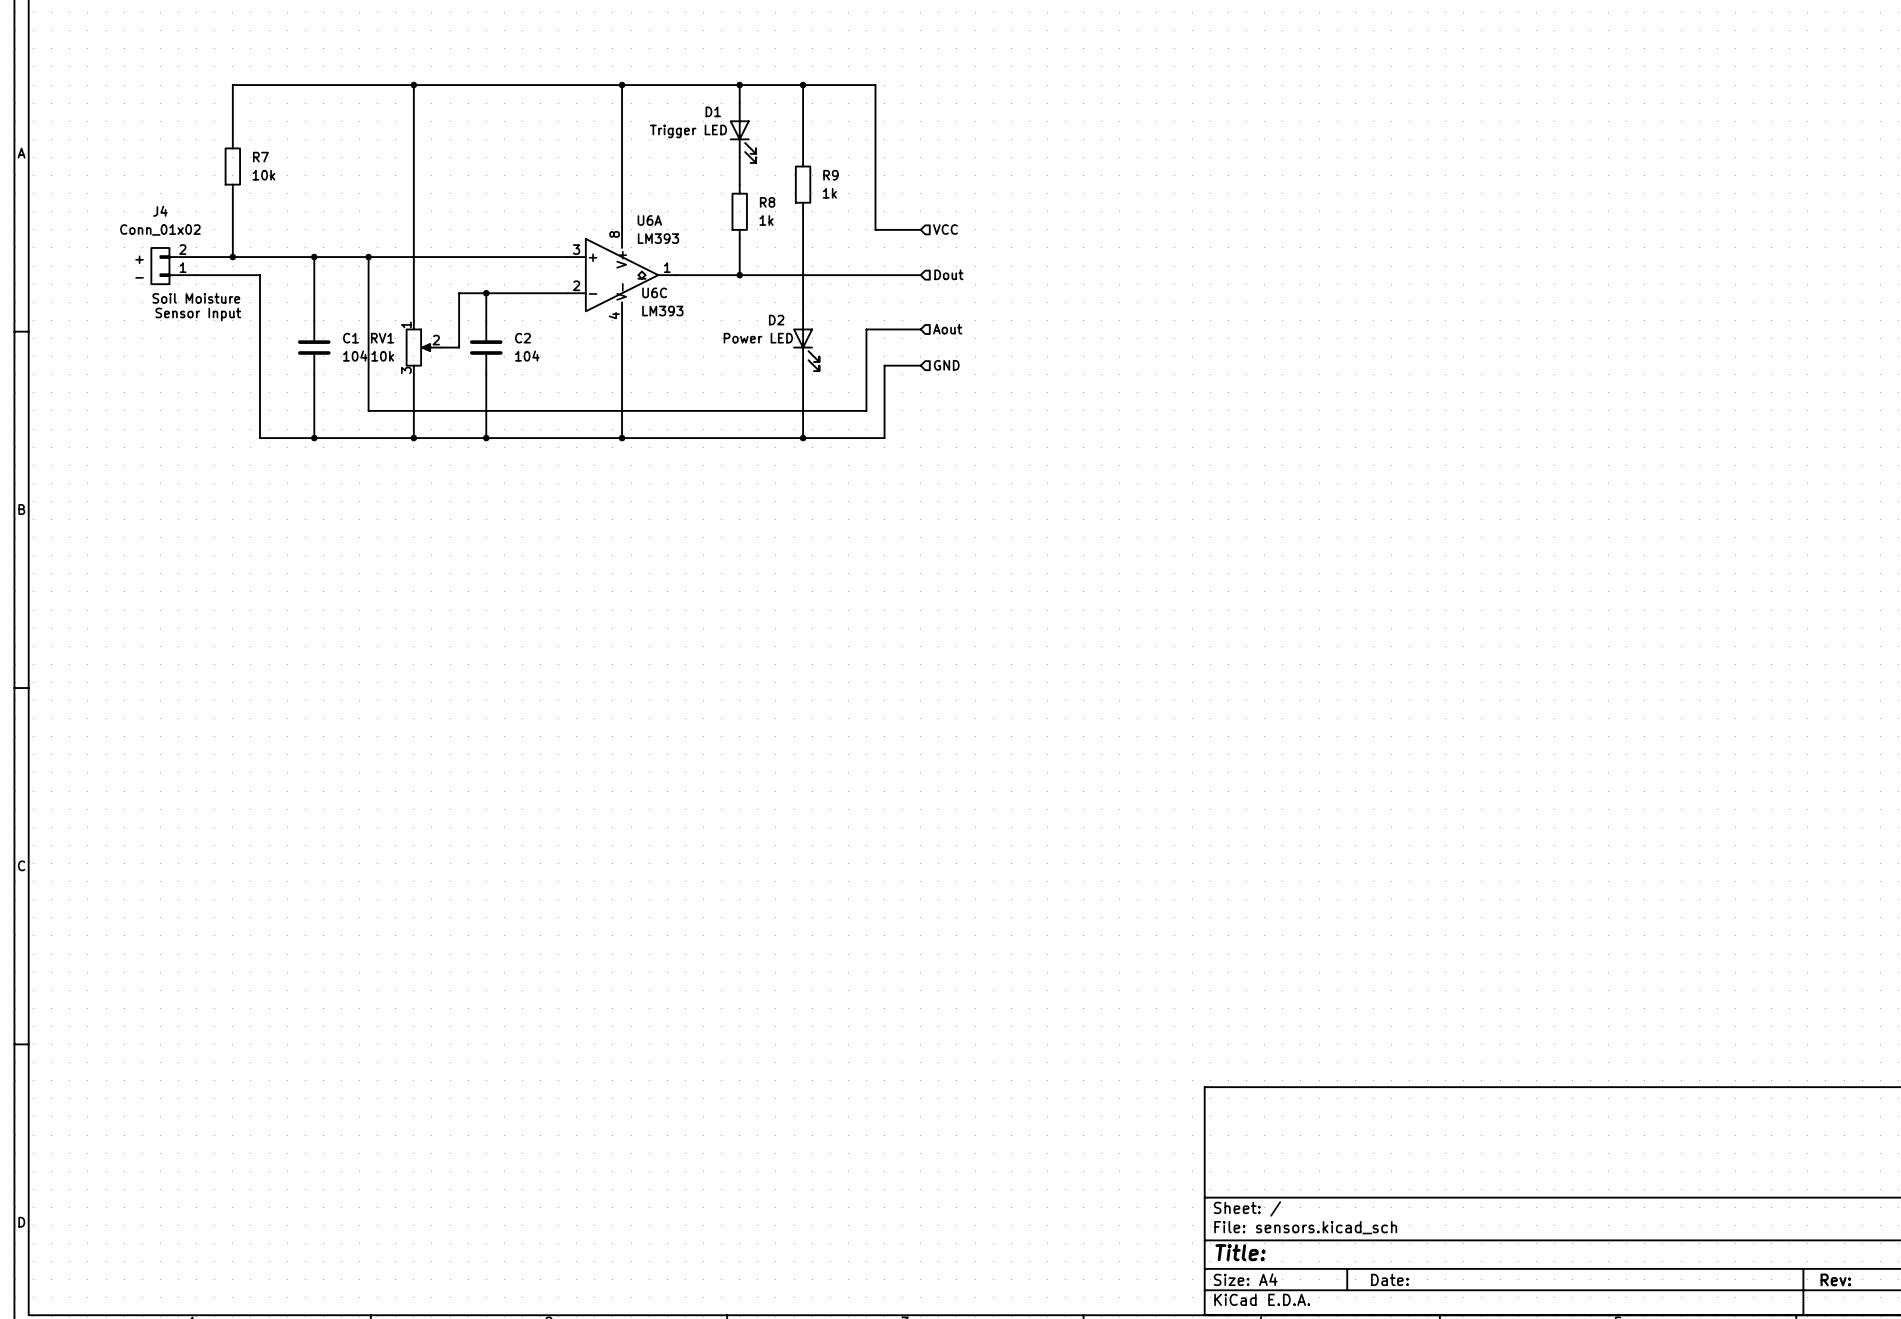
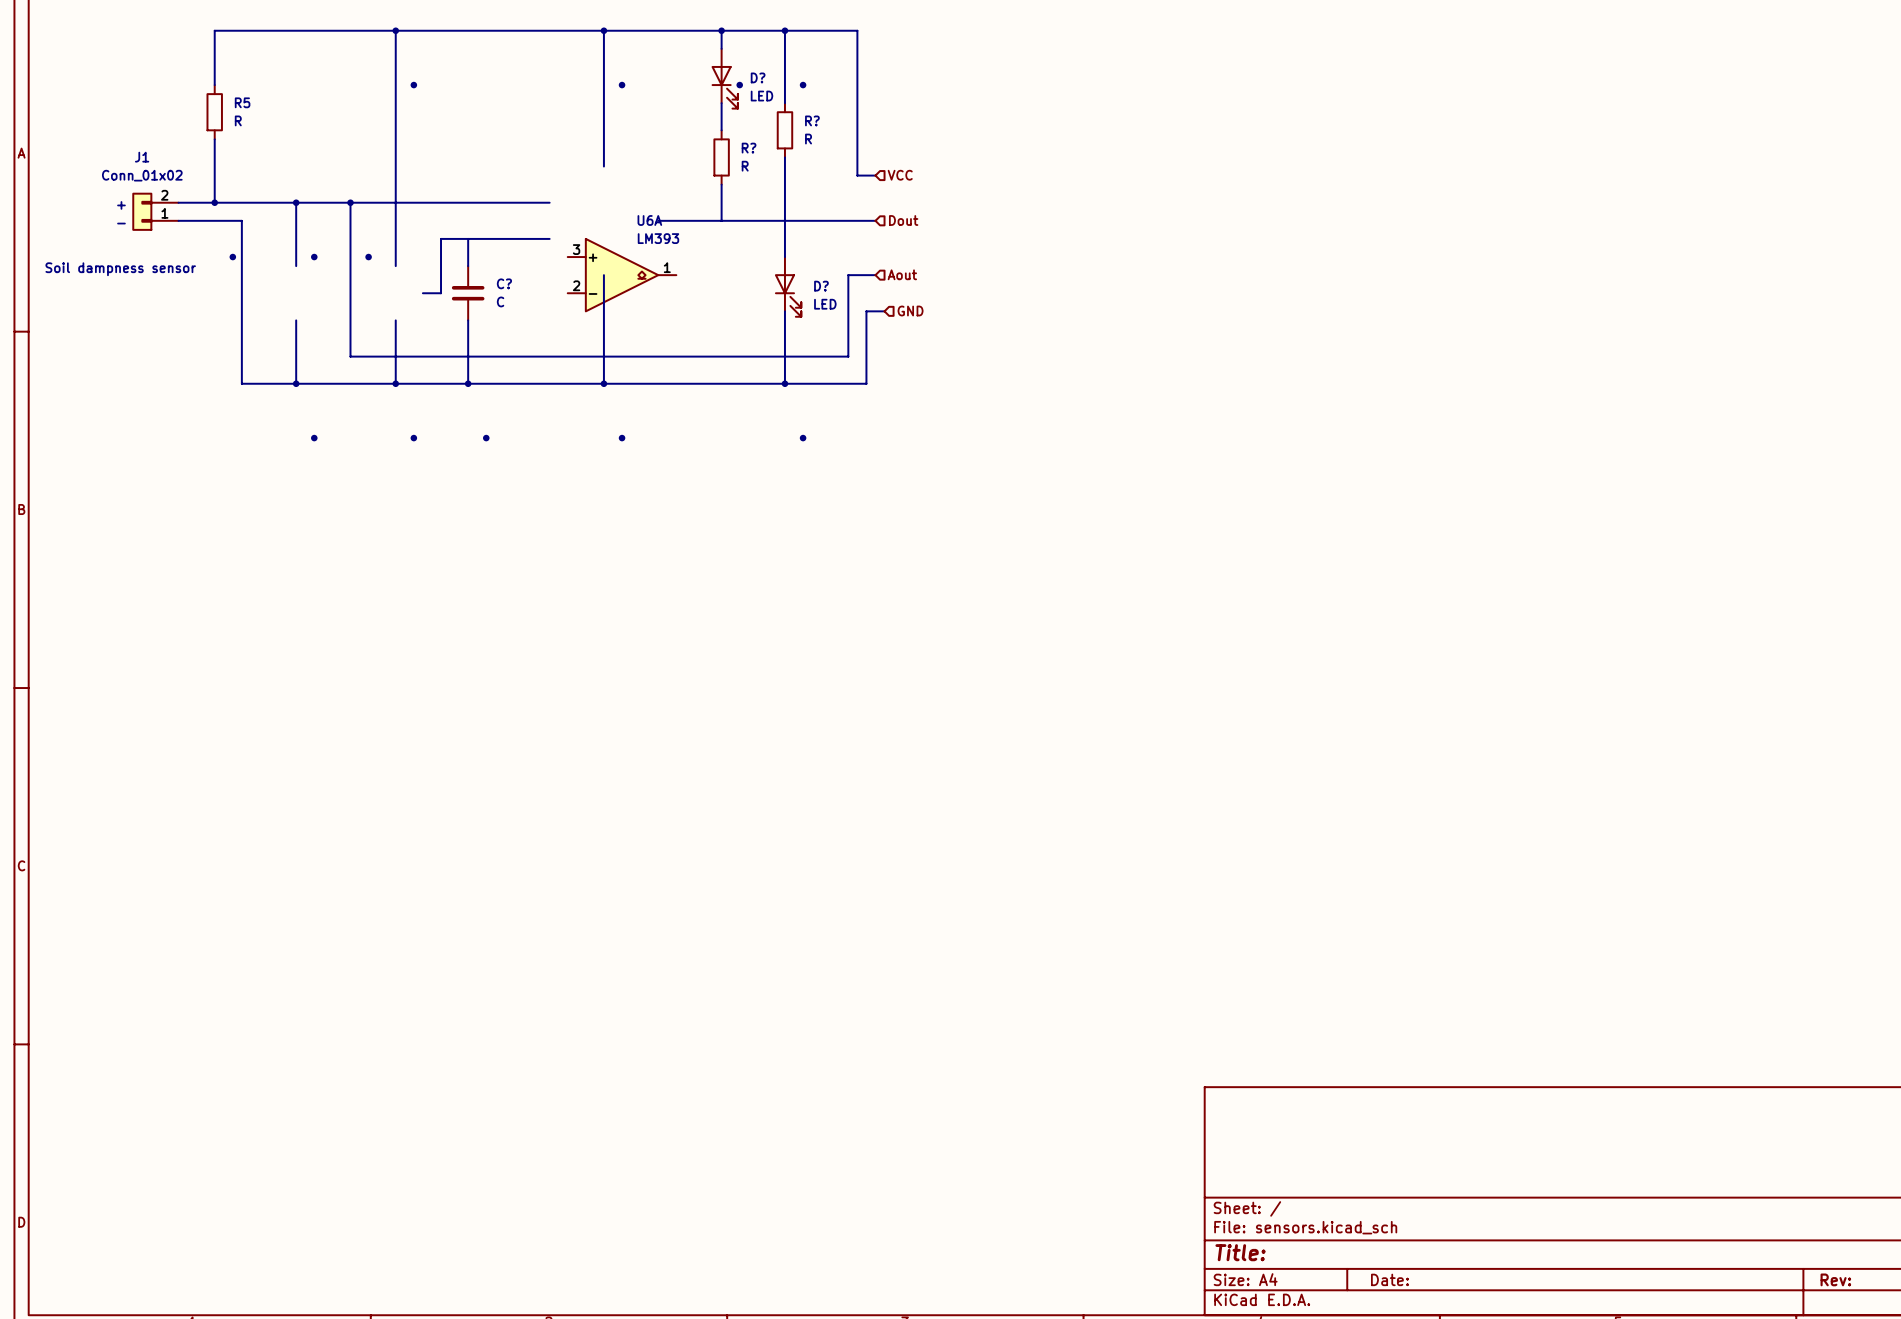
junction: none -> (395, 30)
junction: none -> (603, 30)
junction: none -> (721, 30)
junction: none -> (784, 30)
D?: none -> LED (724, 78)
wire: none -> (214, 85) (214, 30) (857, 30) (857, 175) (875, 175)
wire: (413, 85) (413, 320) -> (395, 30) (395, 266)
wire: (622, 85) (622, 220) -> (603, 30) (603, 166)
wire: (739, 85) (739, 103) -> (721, 30) (721, 48)
wire: (803, 85) (803, 157) -> (784, 30) (784, 103)
R5: none -> R (214, 112)
R?: none -> R (784, 130)
D1: Trigger LED (742, 133) -> none
wire: (232, 139) (232, 85) (875, 85) (875, 229) (920, 229) -> none
R?: none -> R (721, 157)
wire: (739, 157) (739, 184) -> (721, 103) (721, 130)
R7: 10k (232, 166) -> none
R9: 1k (803, 184) -> none
wire: (232, 193) (232, 257) -> (214, 139) (214, 202)
junction: none -> (214, 202)
junction: none -> (296, 202)
junction: none -> (350, 202)
J1: none -> Conn_01x02 (155, 211)
R8: 1k (739, 211) -> none
wire: (803, 211) (803, 311) -> (784, 157) (784, 257)
wire: none -> (658, 220) (875, 220)
hierarchical label position: VCC (945, 229) -> VCC (900, 175)
wire: (739, 238) (739, 275) -> (721, 184) (721, 220)
wire: (196, 257) (567, 257) -> (178, 202) (549, 202)
wire: (314, 257) (314, 320) -> (296, 202) (296, 266)
wire: (368, 257) (368, 410) (866, 410) (866, 383) -> (178, 220) (241, 220) (241, 383) (866, 383)
text position: + (139, 259) -> + (121, 205)
J4: Conn_01x02 (173, 266) -> none
text: none -> Soil dampness sensor (120, 269)
hierarchical label position: Dout (948, 274) -> Dout (903, 220)
wire: (196, 275) (259, 275) (259, 438) (884, 438) (884, 365) (920, 365) -> none
U6C: LM393 (622, 275) -> none
wire: (676, 275) (848, 275) -> (350, 202) (350, 356) (848, 356) (848, 275)
junction: (739, 275) -> none
wire: (875, 275) (920, 275) -> none
text position: - (139, 277) -> - (121, 223)
D?: none -> LED (788, 286)
C?: none -> C (468, 293)
wire: (486, 293) (486, 320) -> (468, 238) (468, 266)
junction: (486, 293) -> none
wire: (567, 293) (459, 293) (459, 347) (441, 347) -> (549, 238) (441, 238) (441, 293) (422, 293)
text: Soil Moisture (196, 298) -> none
text: Sensor Input (198, 314) -> none
wire: (622, 329) (622, 438) -> (603, 275) (603, 383)
wire: (866, 329) (920, 329) -> (866, 329) (866, 311) (884, 311)
hierarchical label position: Aout (947, 329) -> Aout (902, 274)
D2: Power LED (806, 341) -> none
C1: 104 (314, 347) -> none
RV1: 10k (423, 347) -> none
C2: 104 (486, 347) -> none
wire: (803, 365) (803, 438) -> (784, 311) (784, 383)
hierarchical label position: GND (946, 365) -> GND (910, 311)
wire: (314, 374) (314, 438) -> (296, 320) (296, 383)
wire: (413, 374) (413, 438) -> (395, 320) (395, 383)
wire: (486, 374) (486, 438) -> (468, 320) (468, 383)
junction: none -> (296, 383)
junction: none -> (395, 383)
junction: none -> (468, 383)
junction: none -> (603, 383)
junction: none -> (784, 383)

